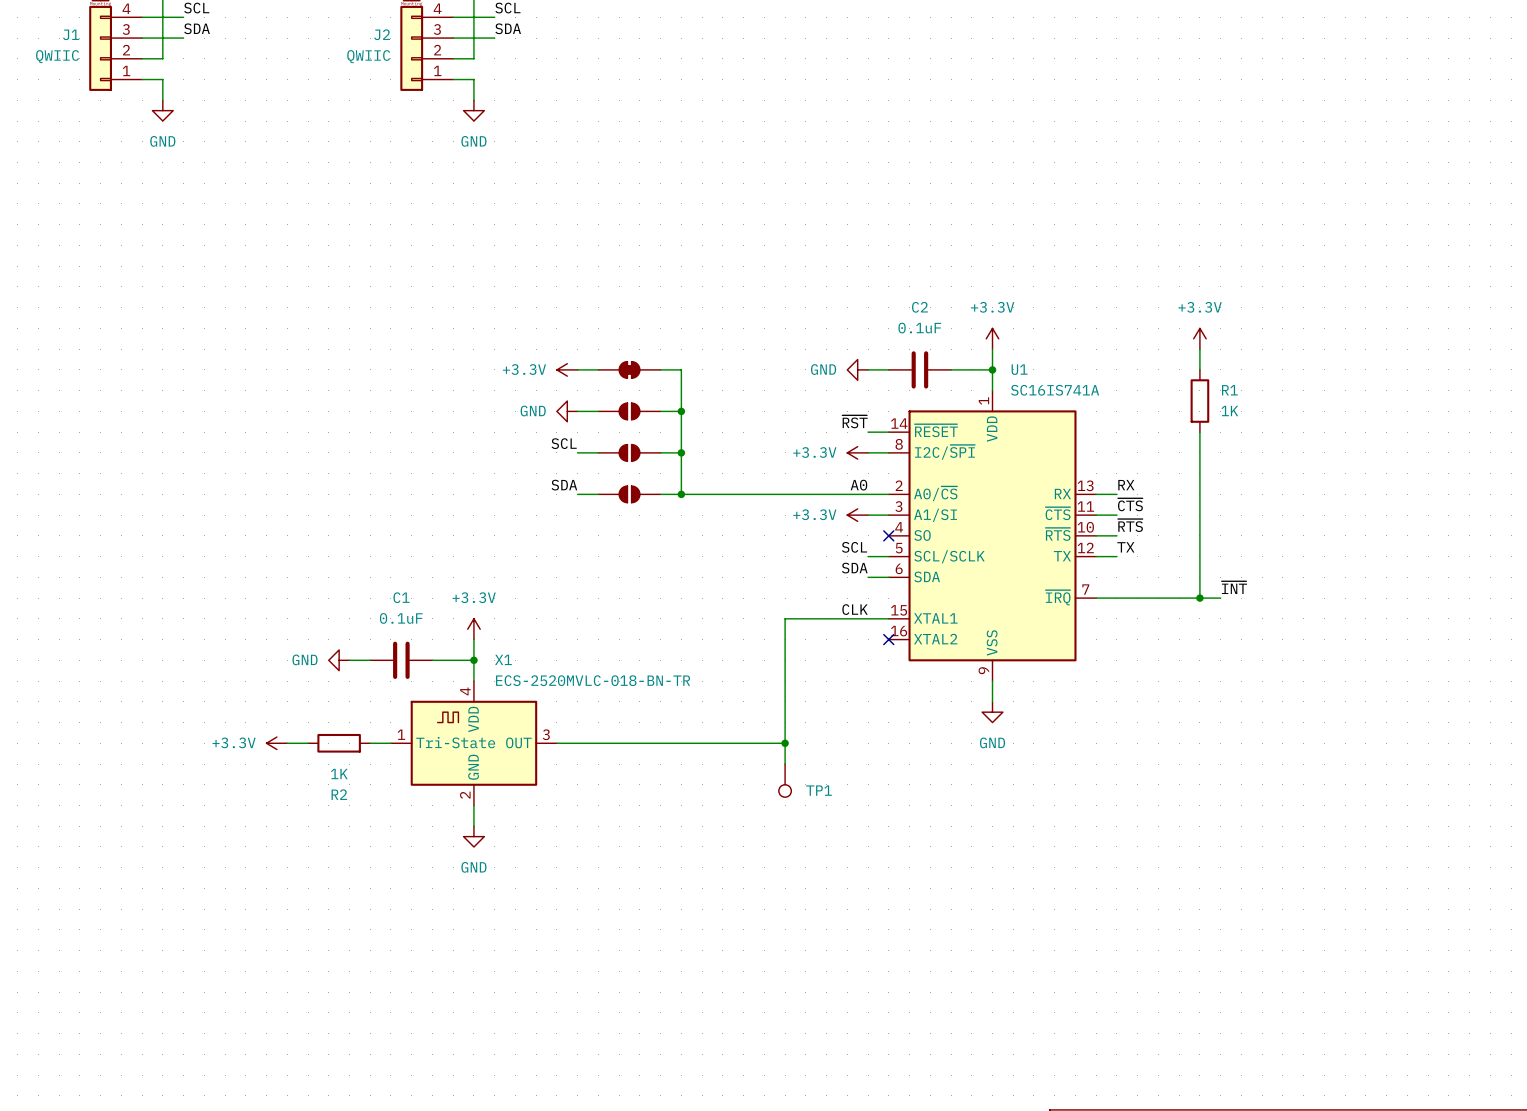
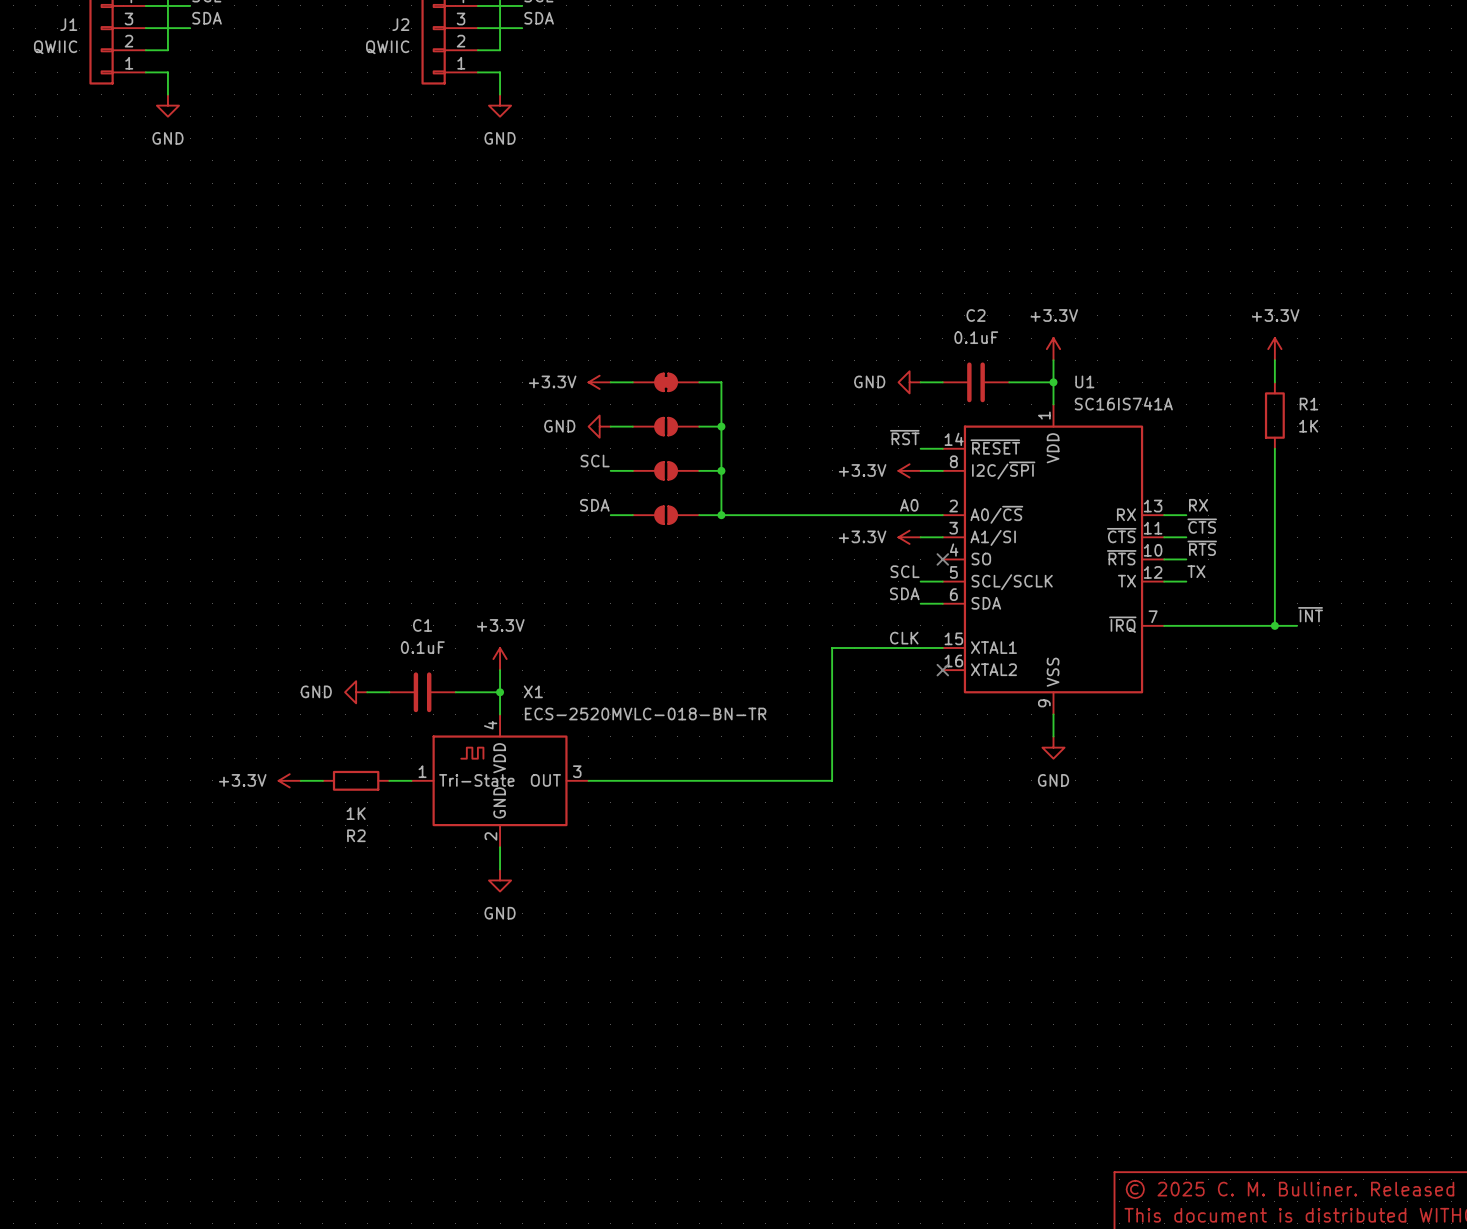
wire: (785, 743) (785, 764) -> none
junction: (785, 743) -> none
TP1: (785, 780) -> none

